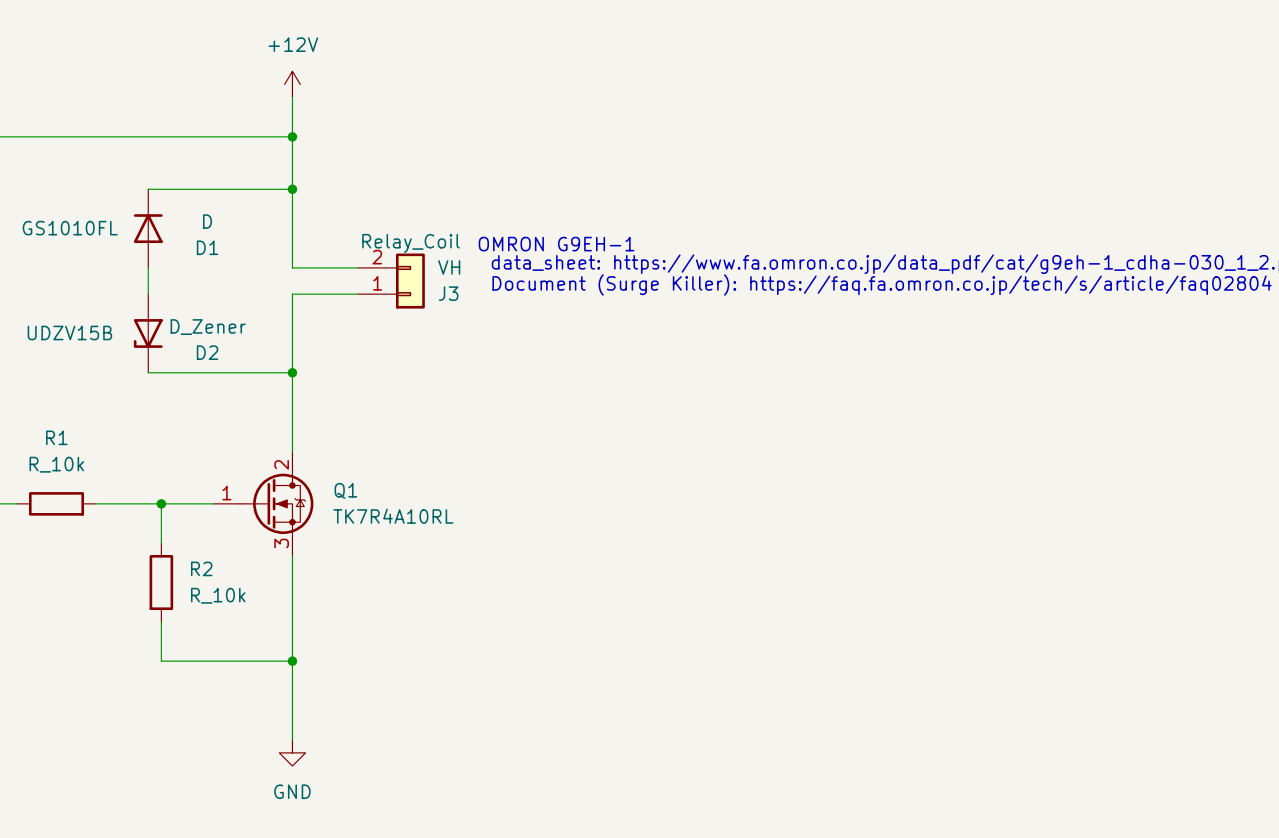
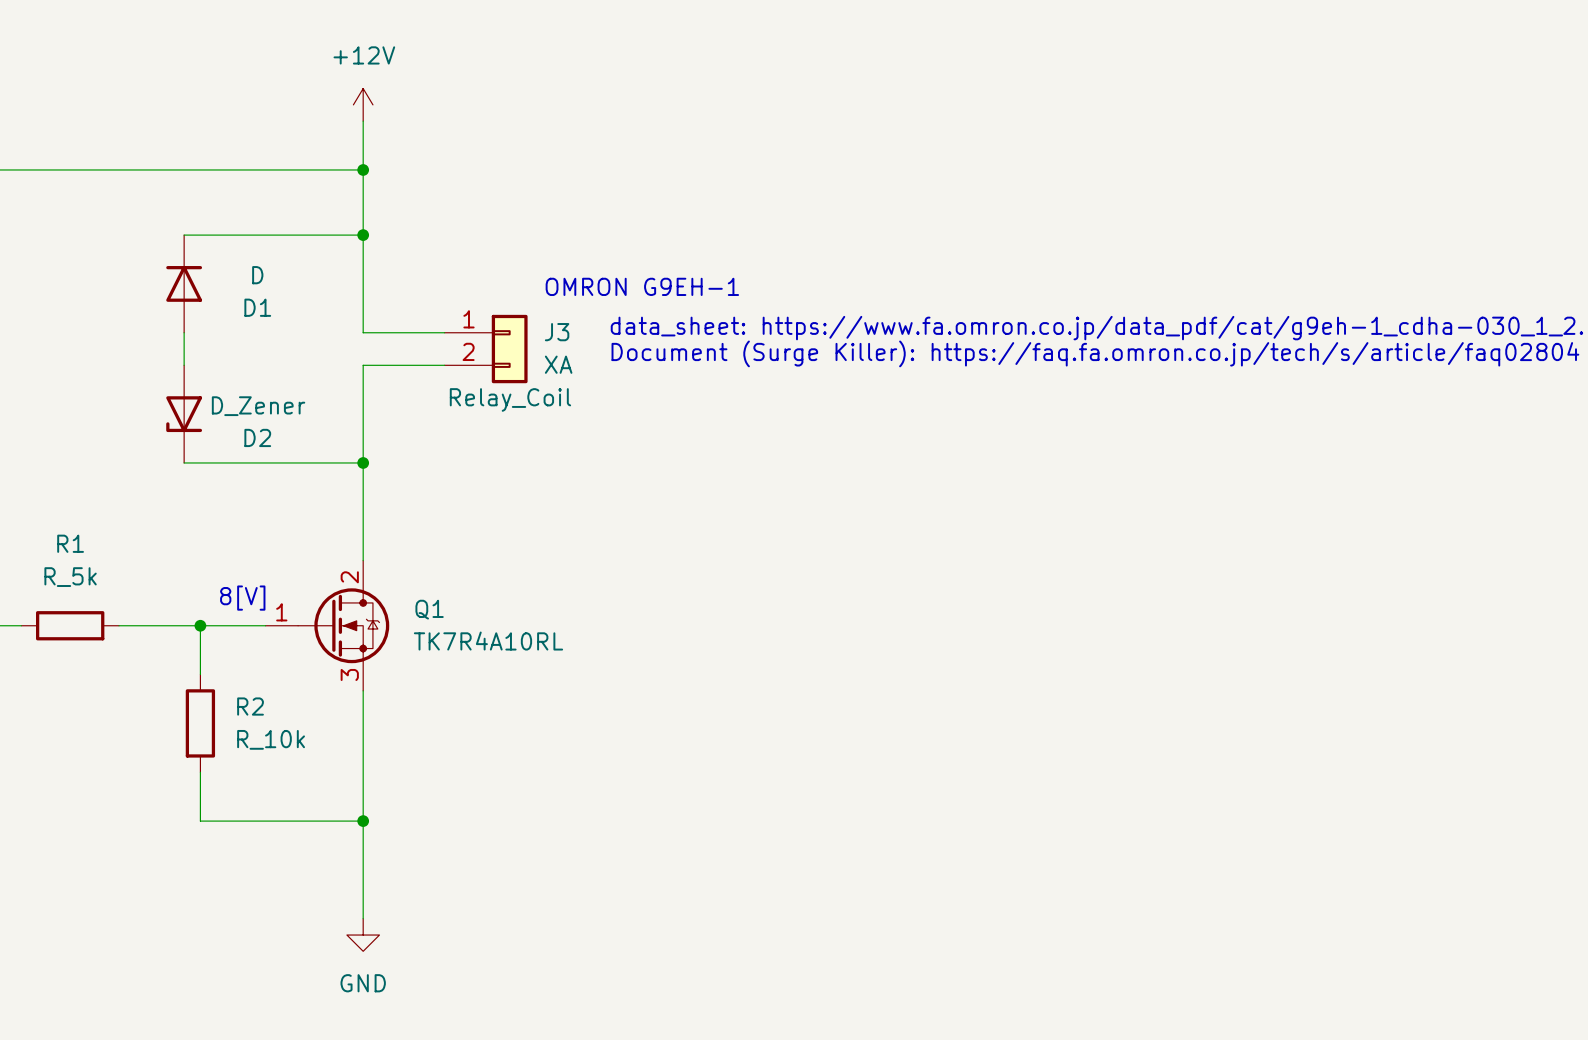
D1 text: GS1010FL (70, 228) -> none
text position: OMRON G9EH-1 (556, 244) -> OMRON G9EH-1 (642, 286)
J3 value: VH (449, 267) -> XA (558, 364)
J3 flip: as is (410, 281) -> up-down (509, 349)
D2 text: UDZV15B (69, 332) -> none
R1 value: R_10k (56, 464) -> R_5k (70, 577)
text: none -> 8[V] (242, 598)

